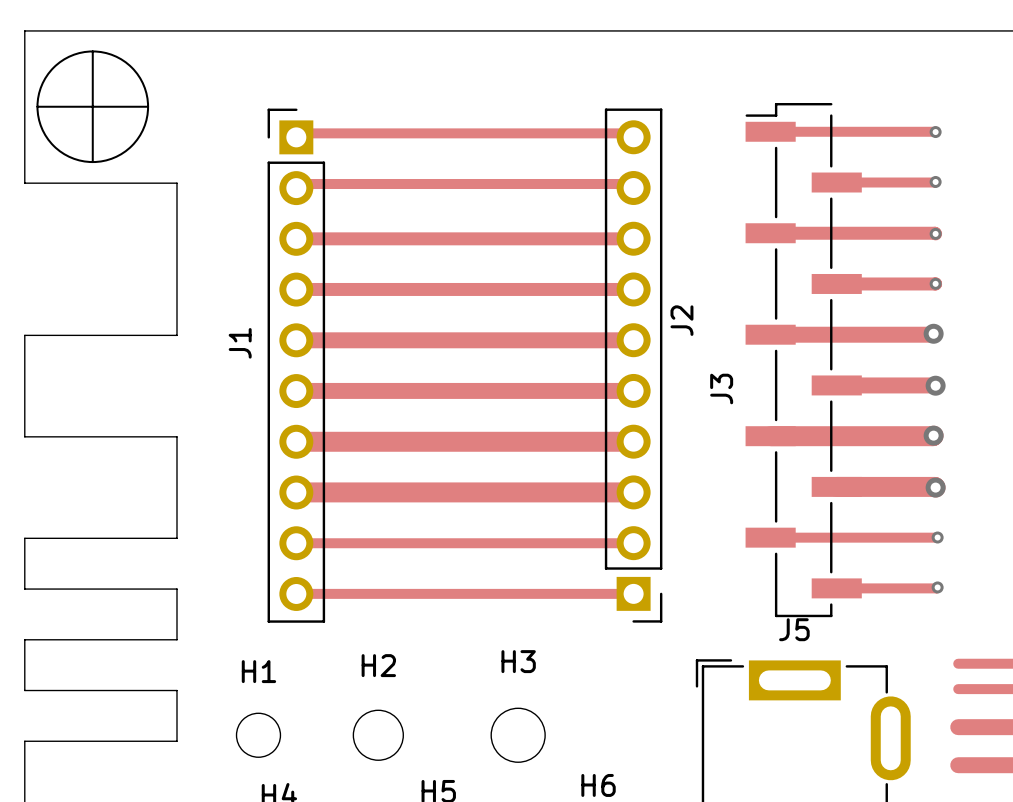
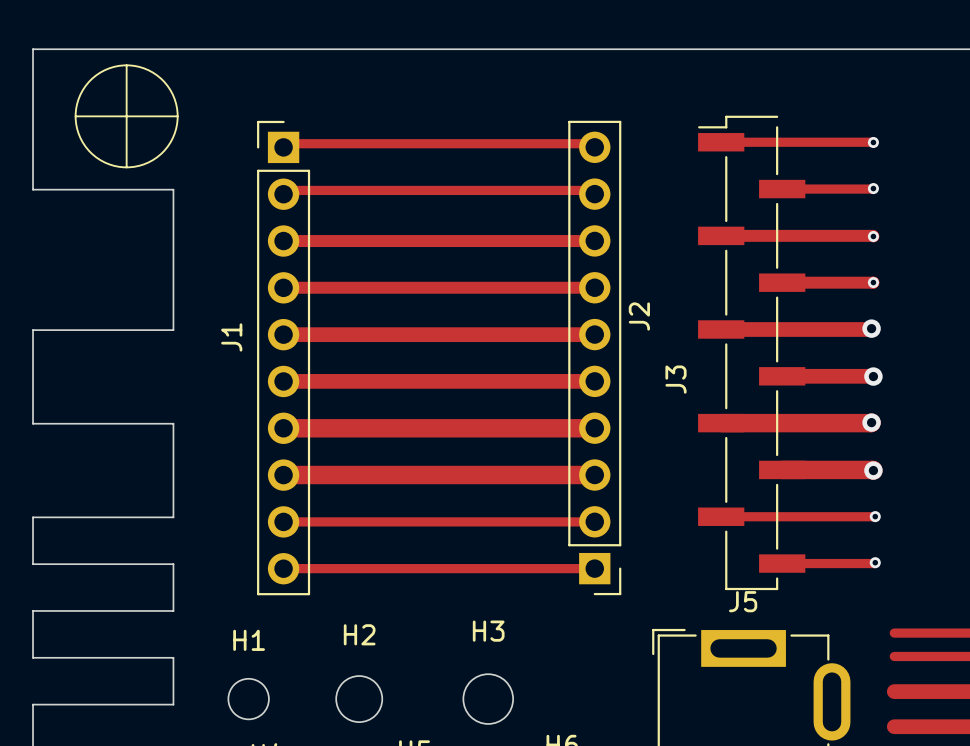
line: (92, 51) (92, 162) -> (126, 65) (126, 167)
line: (37, 106) (148, 106) -> (75, 116) (177, 116)
drawing position: (92, 106) -> (126, 116)

